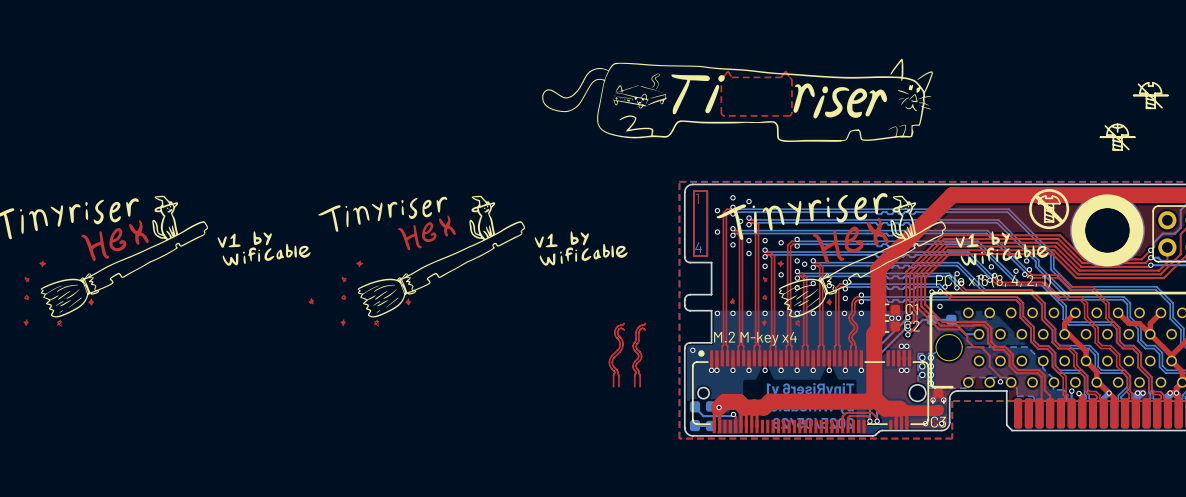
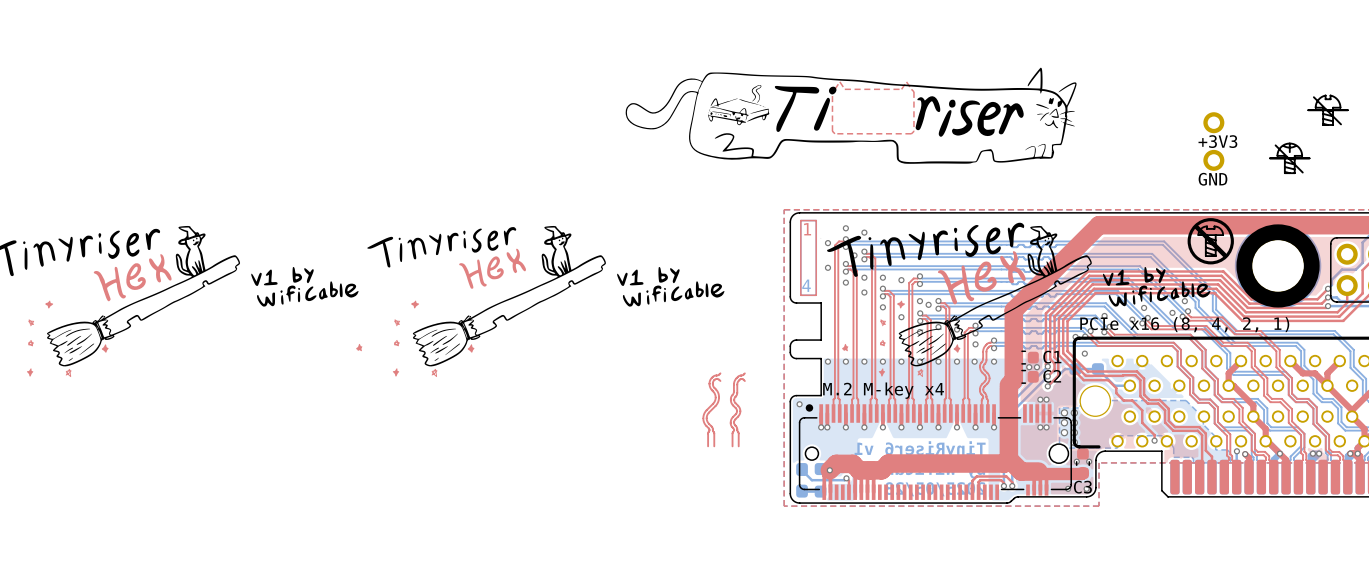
part: none -> (1213, 122)
text: none -> +3V3 (1217, 141)
part: none -> (1213, 160)
text: none -> GND (1212, 179)

